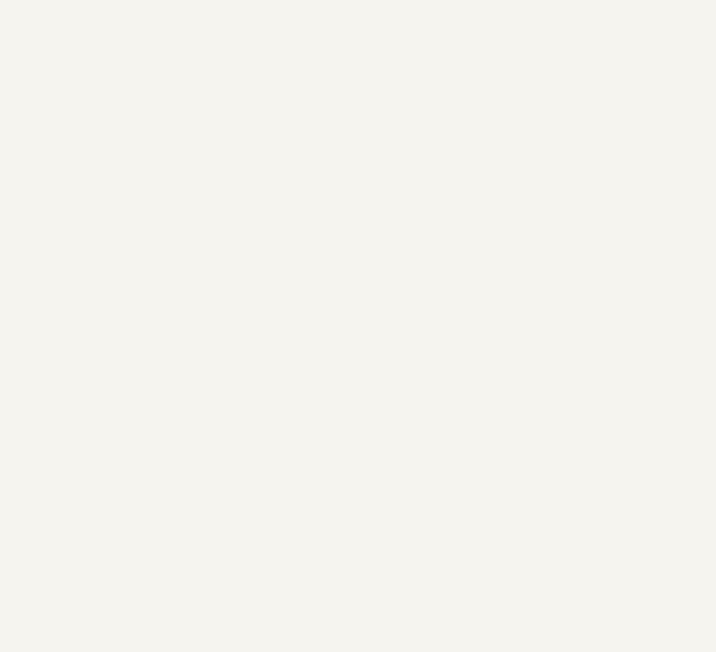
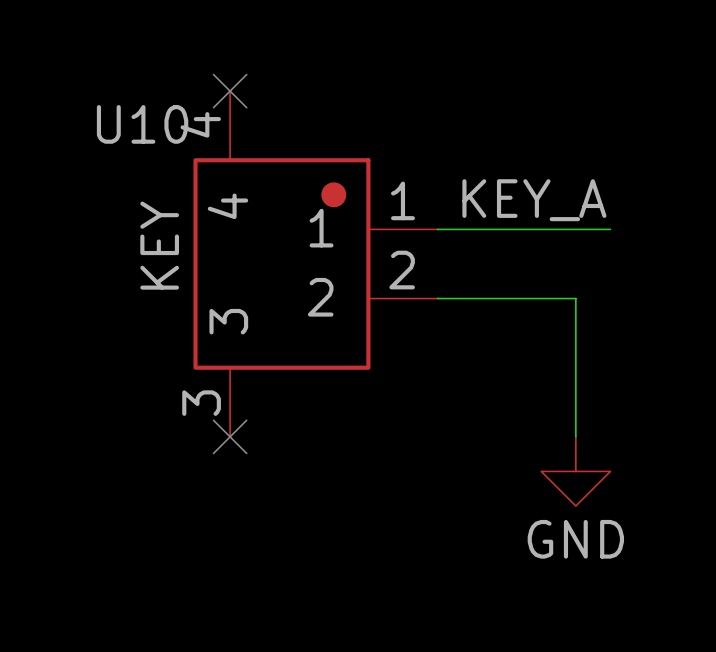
no-connect mark: none -> (230, 91)
label: none -> KEY_A (534, 200)
wire: none -> (437, 229) (610, 229)
U10: none -> KEY (315, 263)
wire: none -> (437, 298) (575, 298) (575, 436)
no-connect mark: none -> (230, 436)
power symbol: none -> GND (575, 471)

